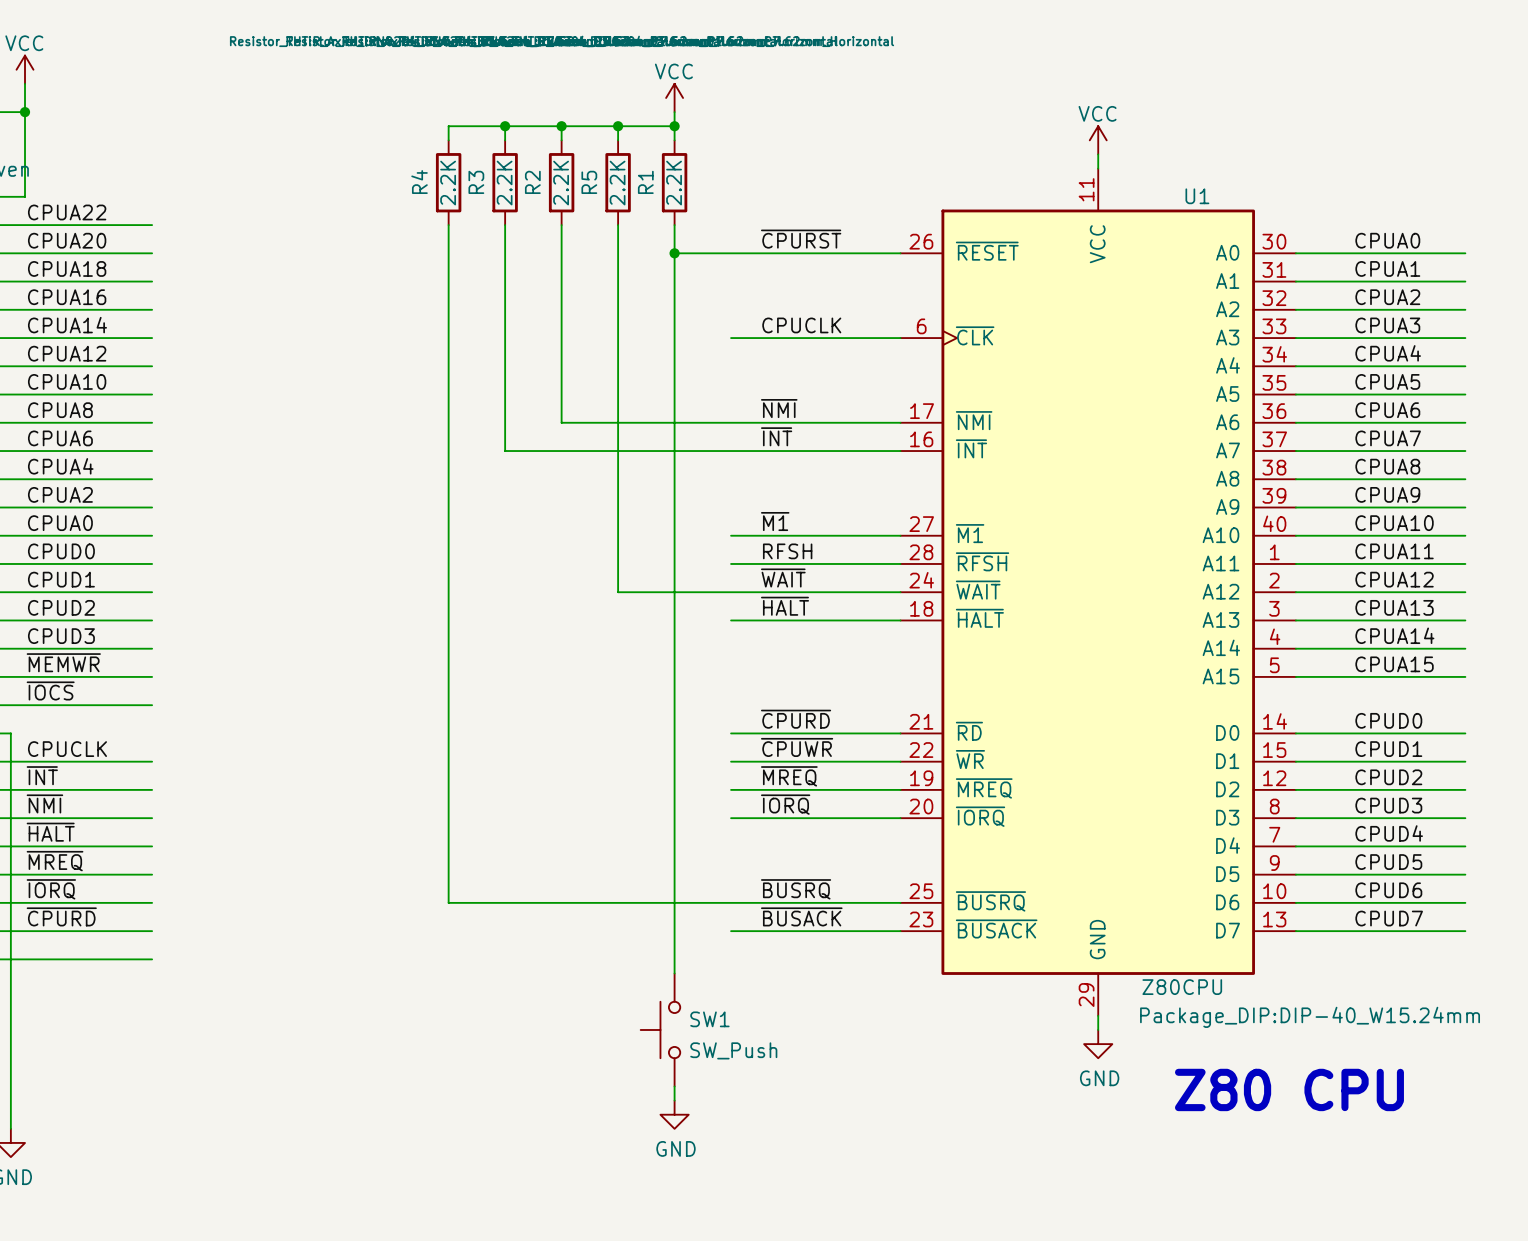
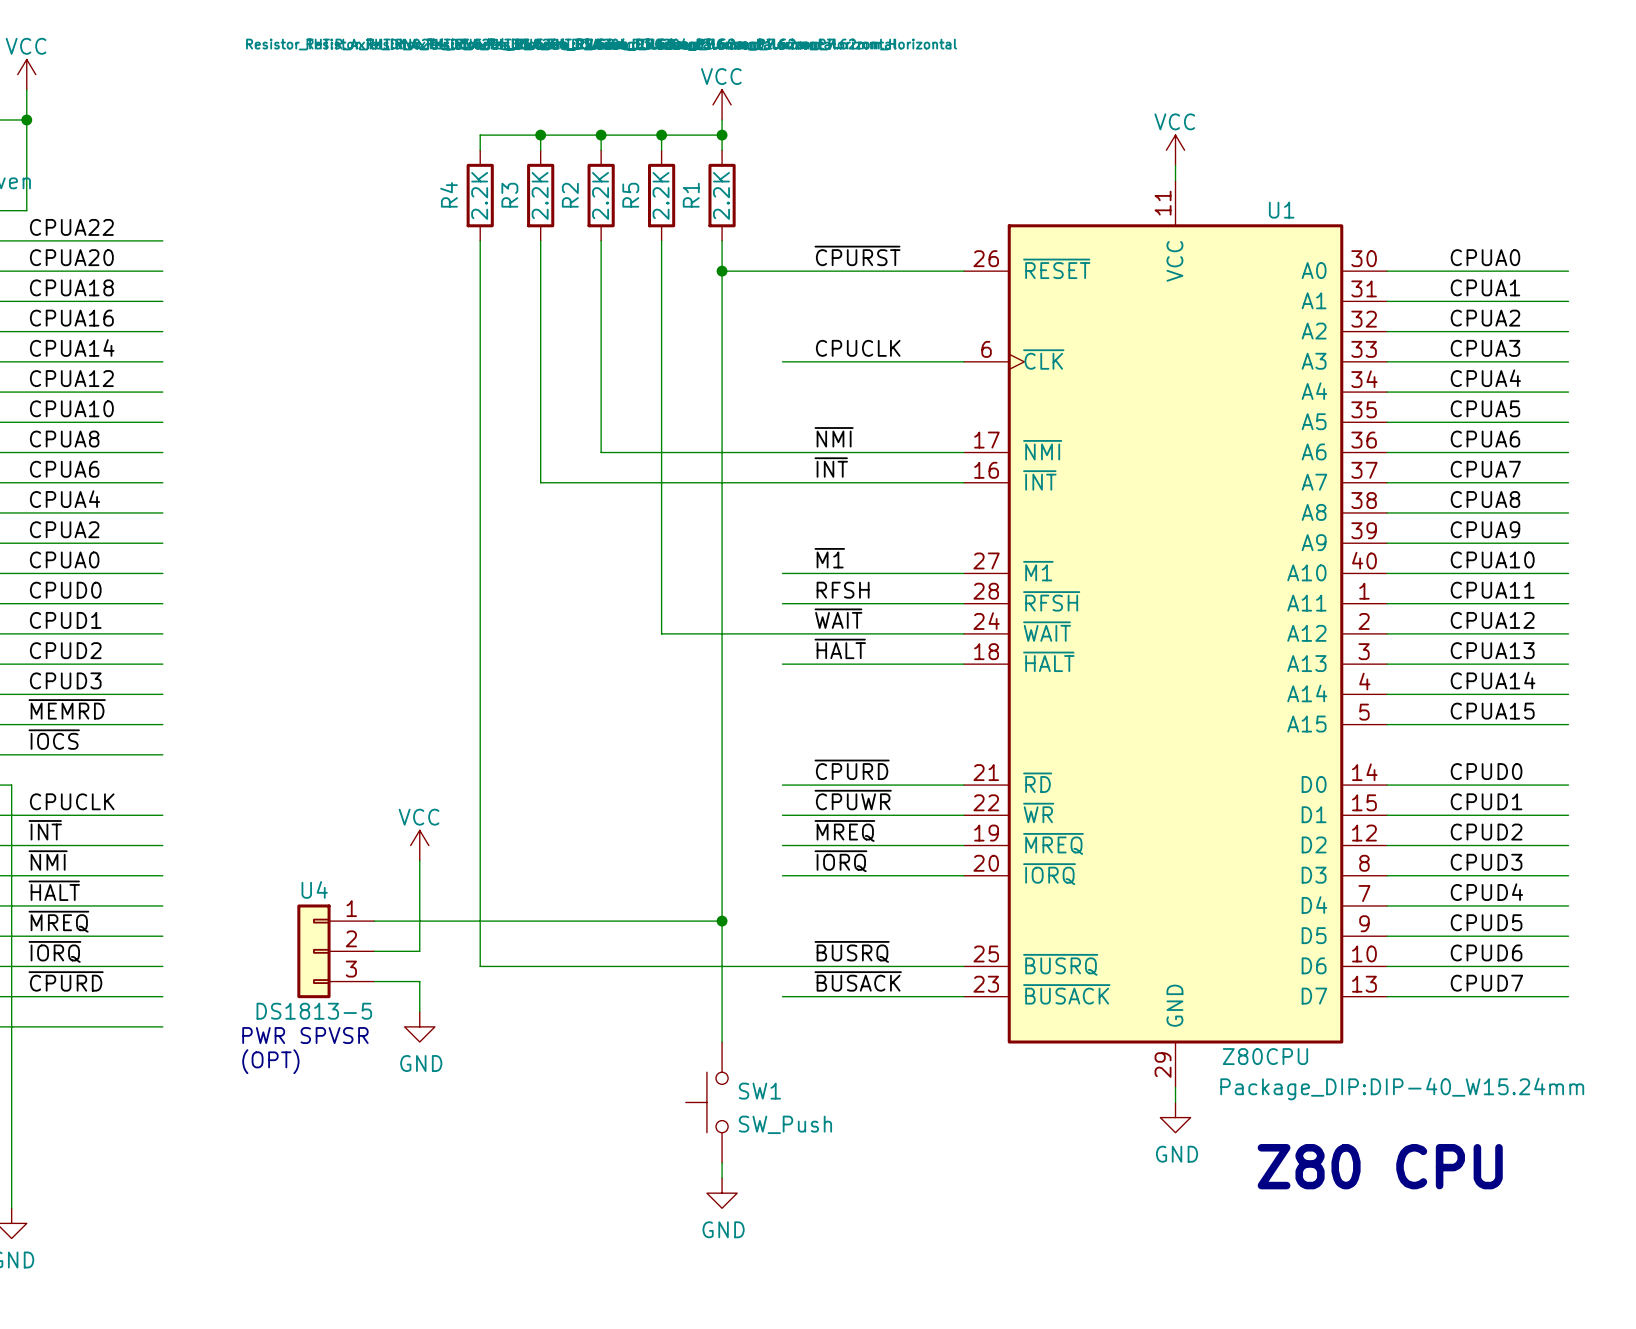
label: ~{MEMWR} (63, 662) -> ~{MEMRD} (67, 709)
power symbol: none -> VCC (419, 845)
wire: none -> (419, 860) (419, 951) (374, 951)
wire: none -> (374, 921) (722, 921)
junction: none -> (722, 921)
U4: none -> DS1813-5 (335, 951)
wire: none -> (374, 981) (419, 981) (419, 1011)
power symbol: none -> GND (419, 1026)
text: none -> PWR SPVSR (305, 1035)
text: none -> (OPT) (270, 1061)

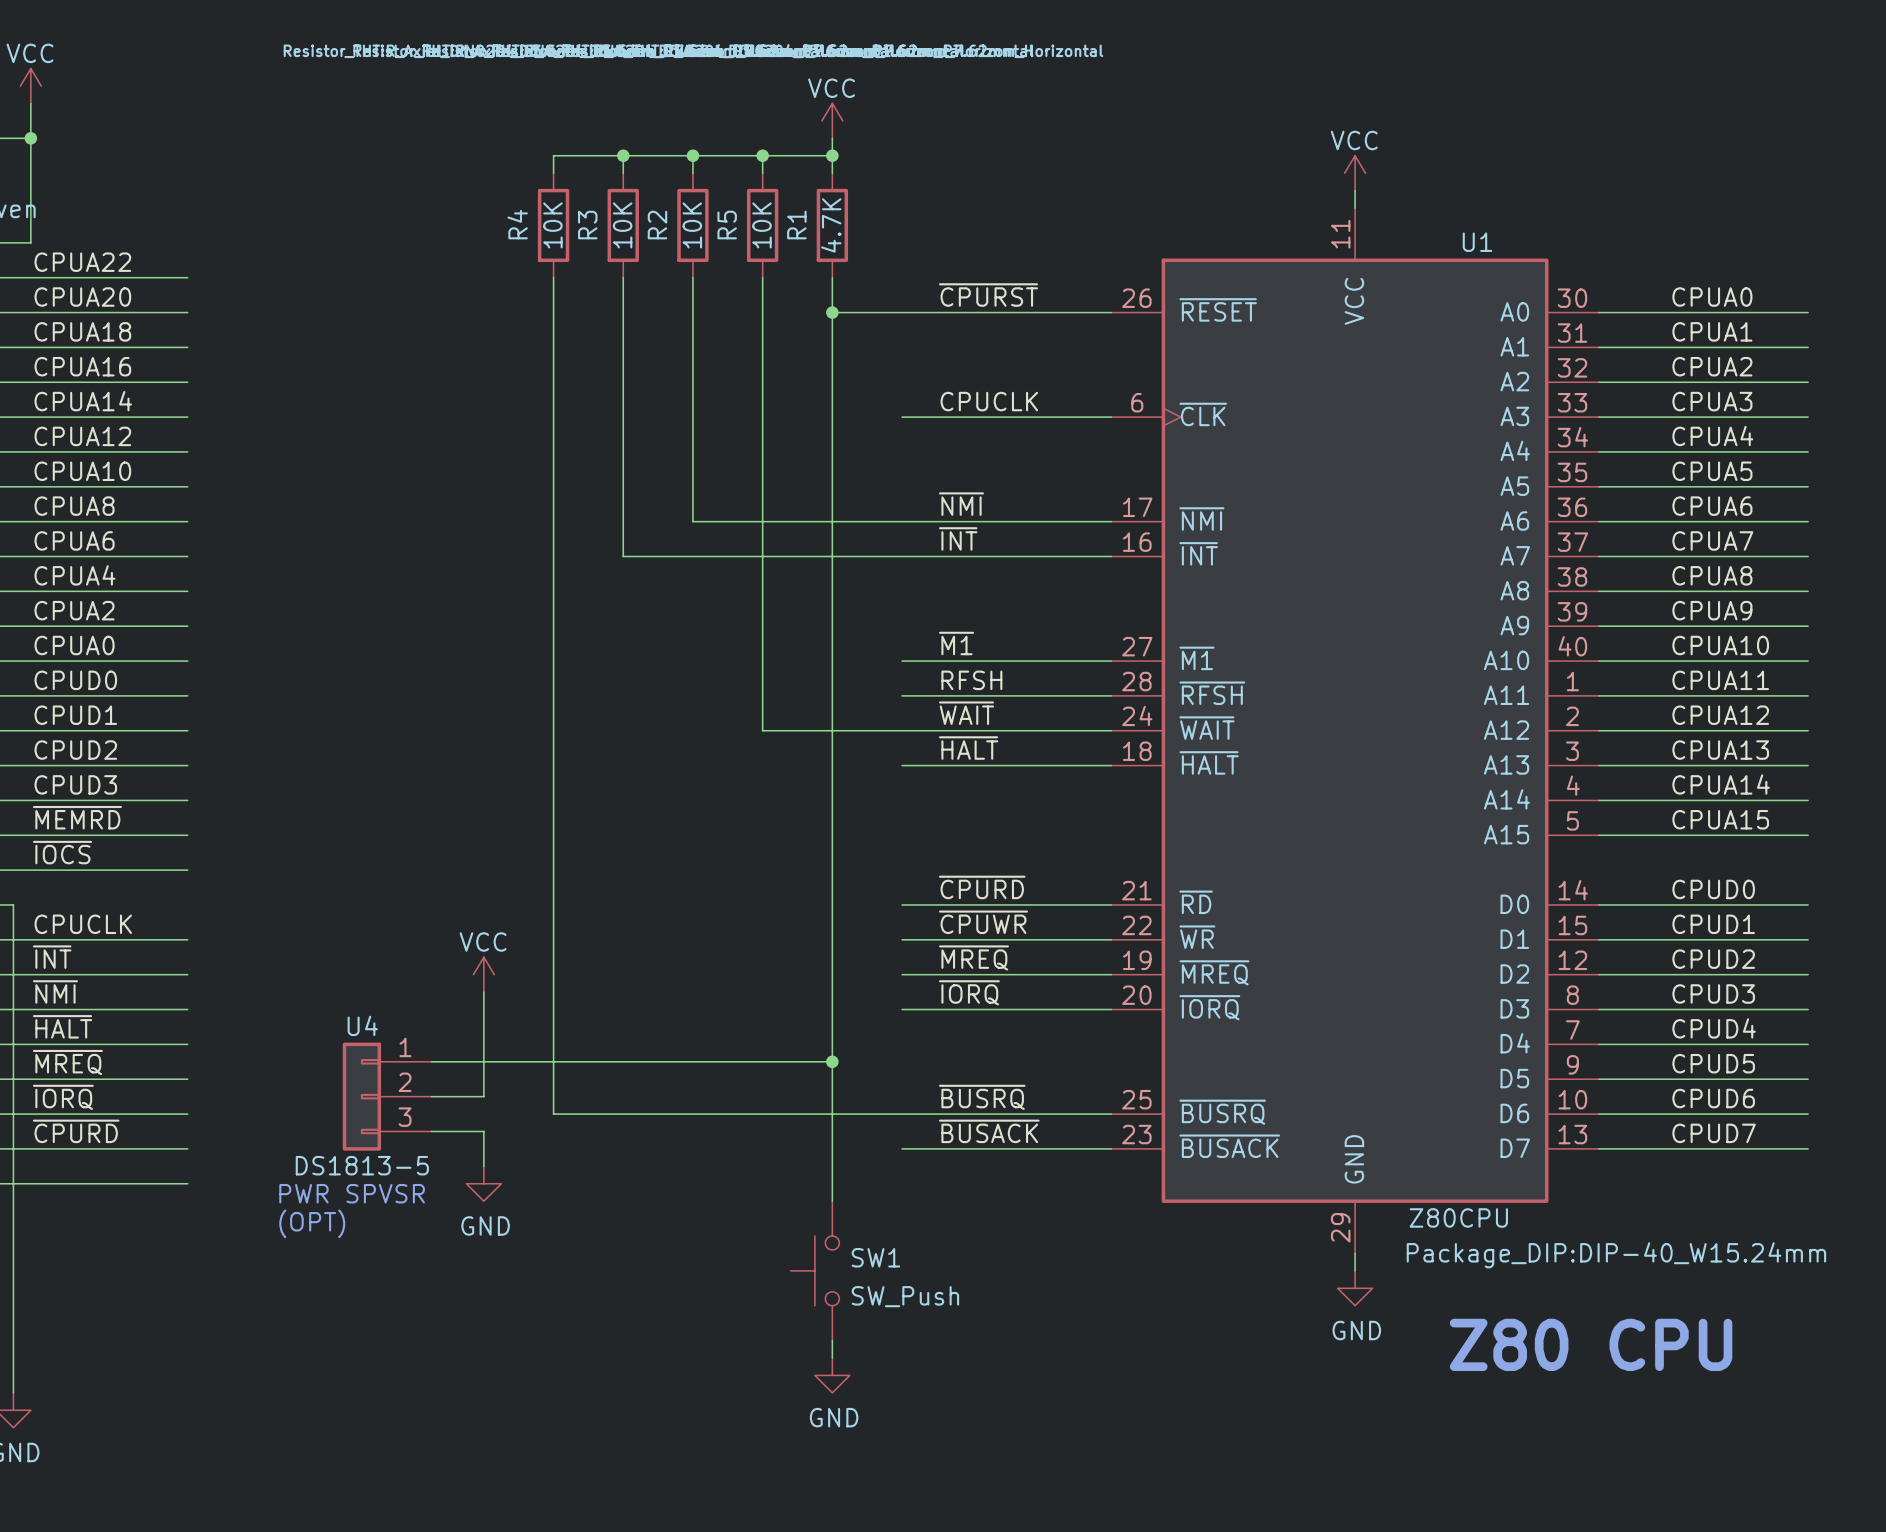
R4 value: 2.2K (479, 195) -> 10K (552, 225)
R3 value: 2.2K (540, 195) -> 10K (622, 225)
R2 value: 2.2K (600, 195) -> 10K (692, 225)
R5 value: 2.2K (661, 195) -> 10K (762, 225)
R1 value: 2.2K (721, 195) -> 4.7K (831, 225)

